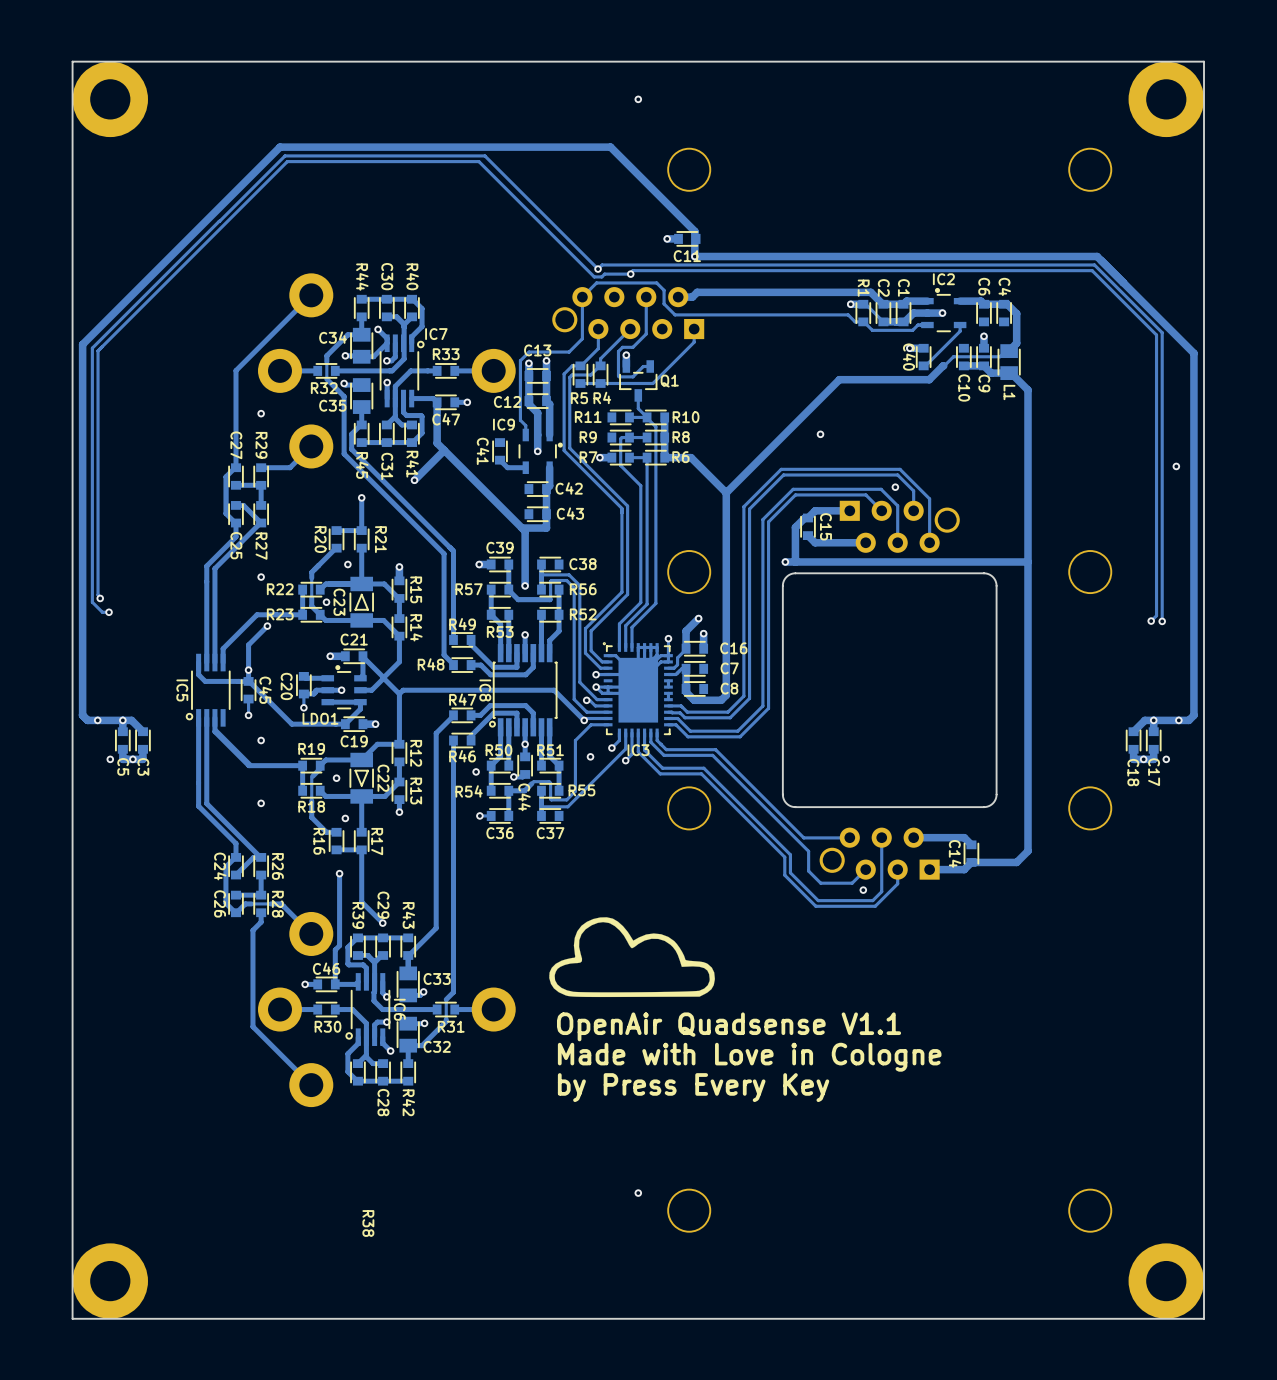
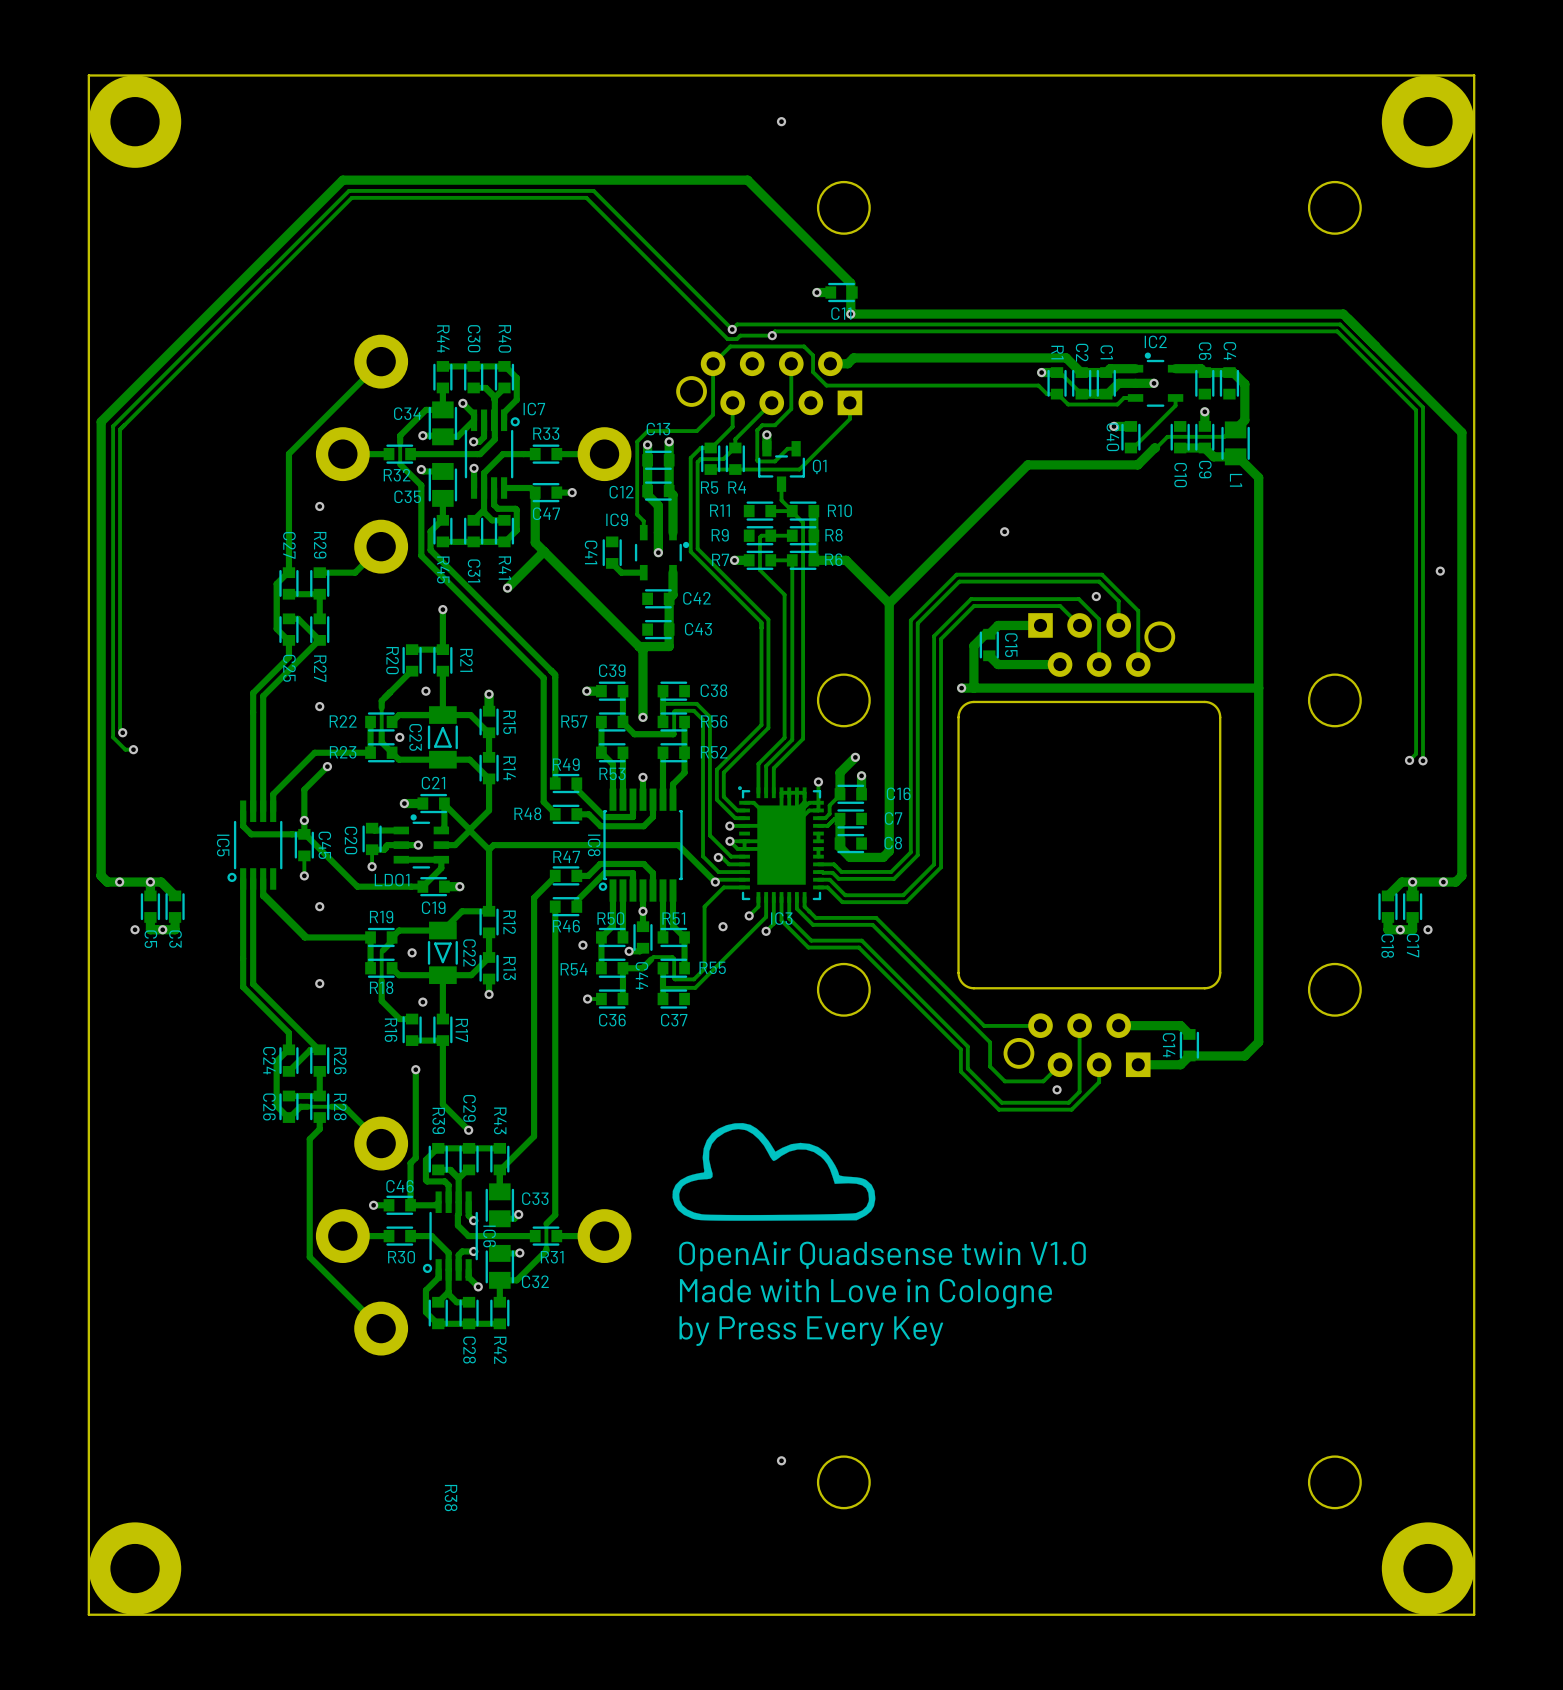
text: OpenAir Quadsense V1.1 (729, 1026) -> OpenAir Quadsense twin V1.0 (882, 1256)

